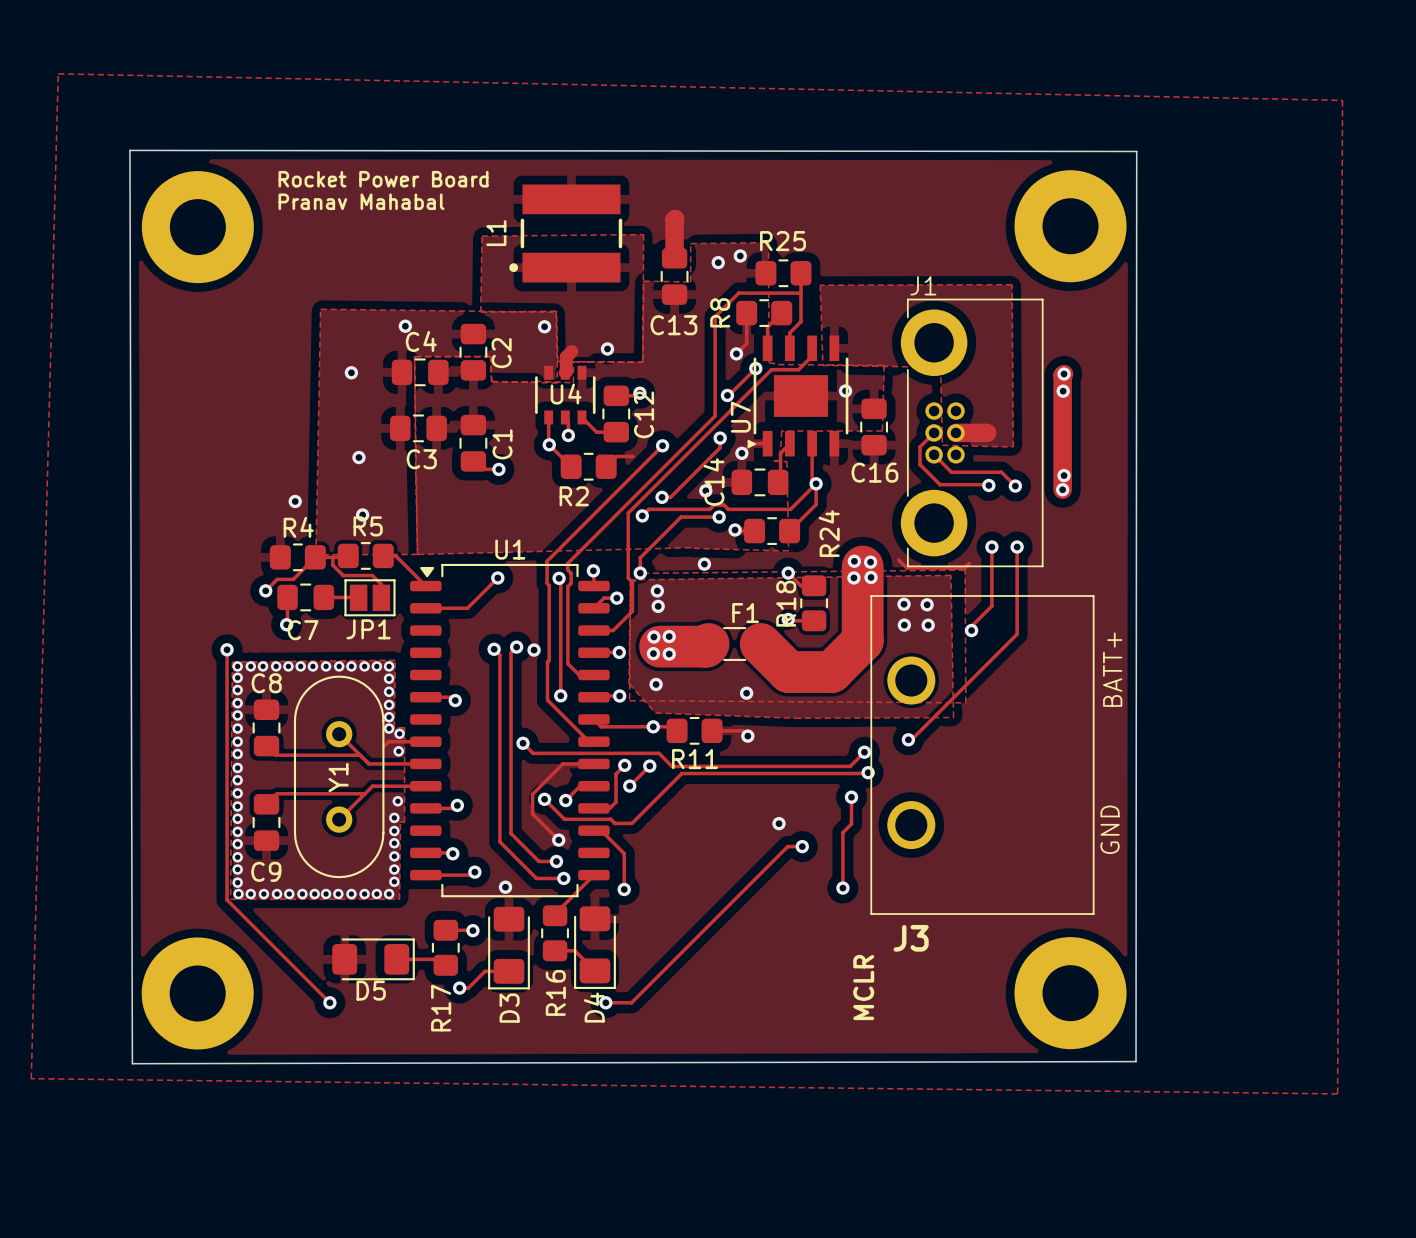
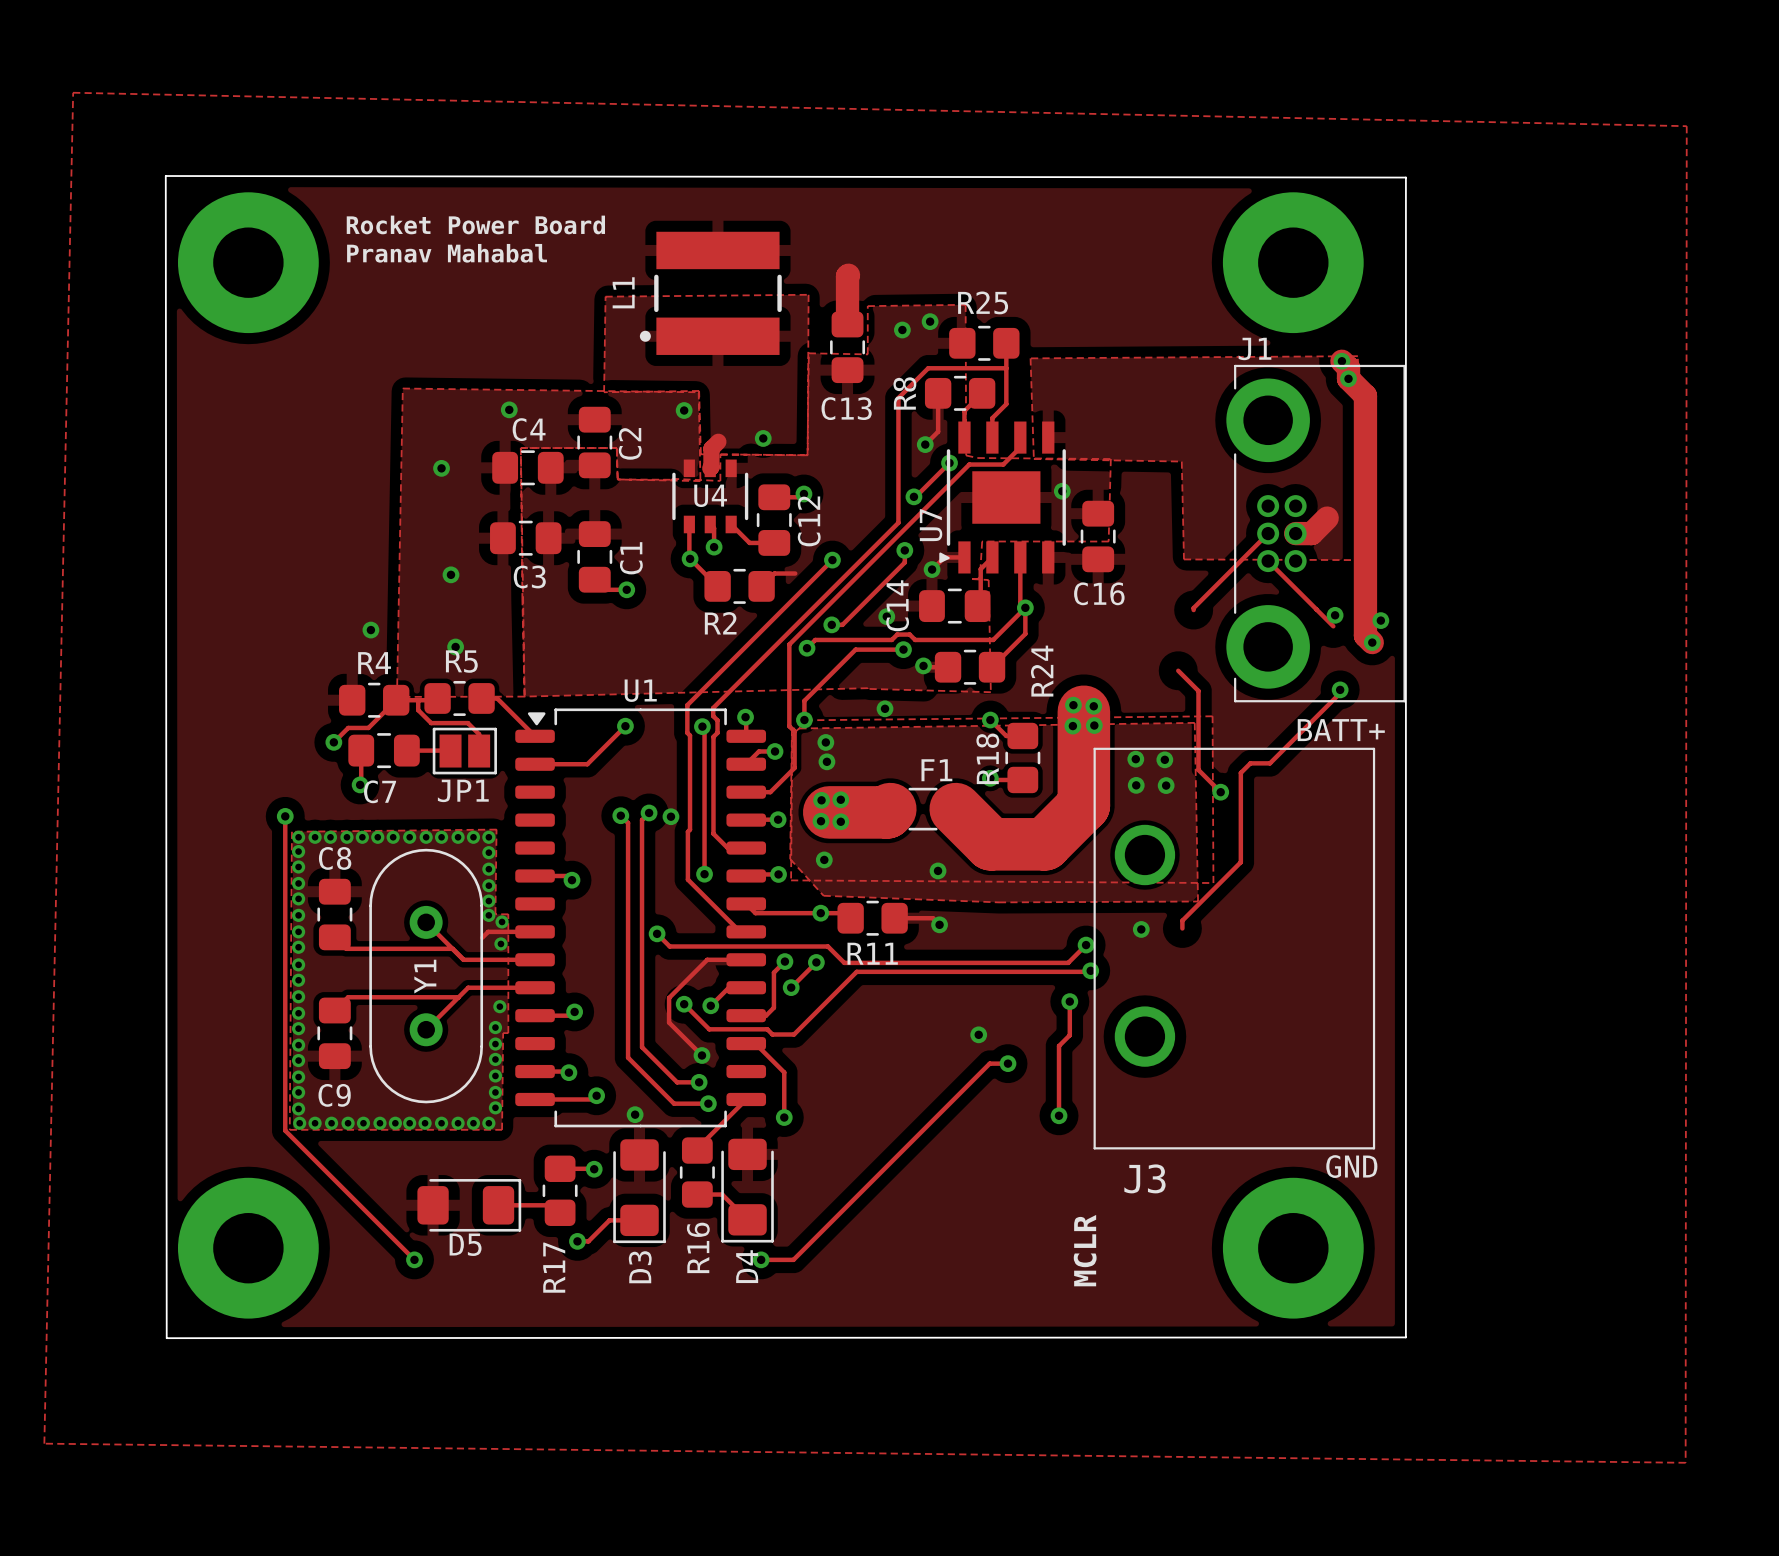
zone outline: (58, 73) (31, 1078) (1337, 1093) (1342, 100) -> (73, 92) (44, 1443) (1685, 1462) (1686, 126)
board edge: (129, 150) (132, 1063) (1136, 1061) (1136, 151) (129, 150) -> (165, 176) (166, 1338) (1405, 1337) (1405, 177) (165, 176)
part position: (1070, 226) -> (1293, 262)
part position: (197, 227) -> (248, 262)
zone outline: (820, 285) (1012, 284) (1013, 447) (942, 445) -> (1030, 358) (1357, 356) (1359, 560) (1183, 559)
track: none -> (1341, 361) (1348, 367) (1348, 378) (1365, 395) (1365, 635) (1372, 642)
via: none -> (1341, 361)
via: none -> (1348, 378)
track: (1064, 374) (1062, 489) -> none
via: (1064, 374) -> none
via: (1063, 391) -> none
track: none -> (1327, 518) (1311, 533) (1295, 533)
track: none -> (1268, 533) (1193, 610)
track: (934, 432) (920, 447) (920, 464) (940, 484) (988, 485) -> none
track: (955, 432) (987, 432) -> none
J1 position: (972, 432) -> (1315, 533)
track: (934, 454) (951, 472) (1001, 472) (1015, 486) -> none
via: (1064, 475) -> none
via: (988, 485) -> none
via: (1015, 486) -> none
via: none -> (1380, 620)
via: none -> (1372, 642)
track: (991, 547) (991, 606) (971, 626) (971, 630) -> (1178, 670) (1198, 690) (1198, 769) (1220, 792)
via: (991, 547) -> none
track: (1017, 547) (1017, 634) (911, 739) (908, 739) -> none
via: (1017, 547) -> none
track: none -> (1340, 689) (1340, 693) (1269, 763) (1250, 763) (1240, 772) (1240, 862) (1182, 920) (1182, 928)
via: none -> (1340, 689)
track: (898, 559) (906, 568) (964, 568) (969, 563) -> none
text rotation: 0° (1112, 669) -> 90° clockwise (1341, 730)
text rotation: 0° (1110, 829) -> 90° clockwise (1351, 1166)
text position: GND (1110, 829) -> GND (1351, 1166)
part position: (1070, 993) -> (1293, 1248)

